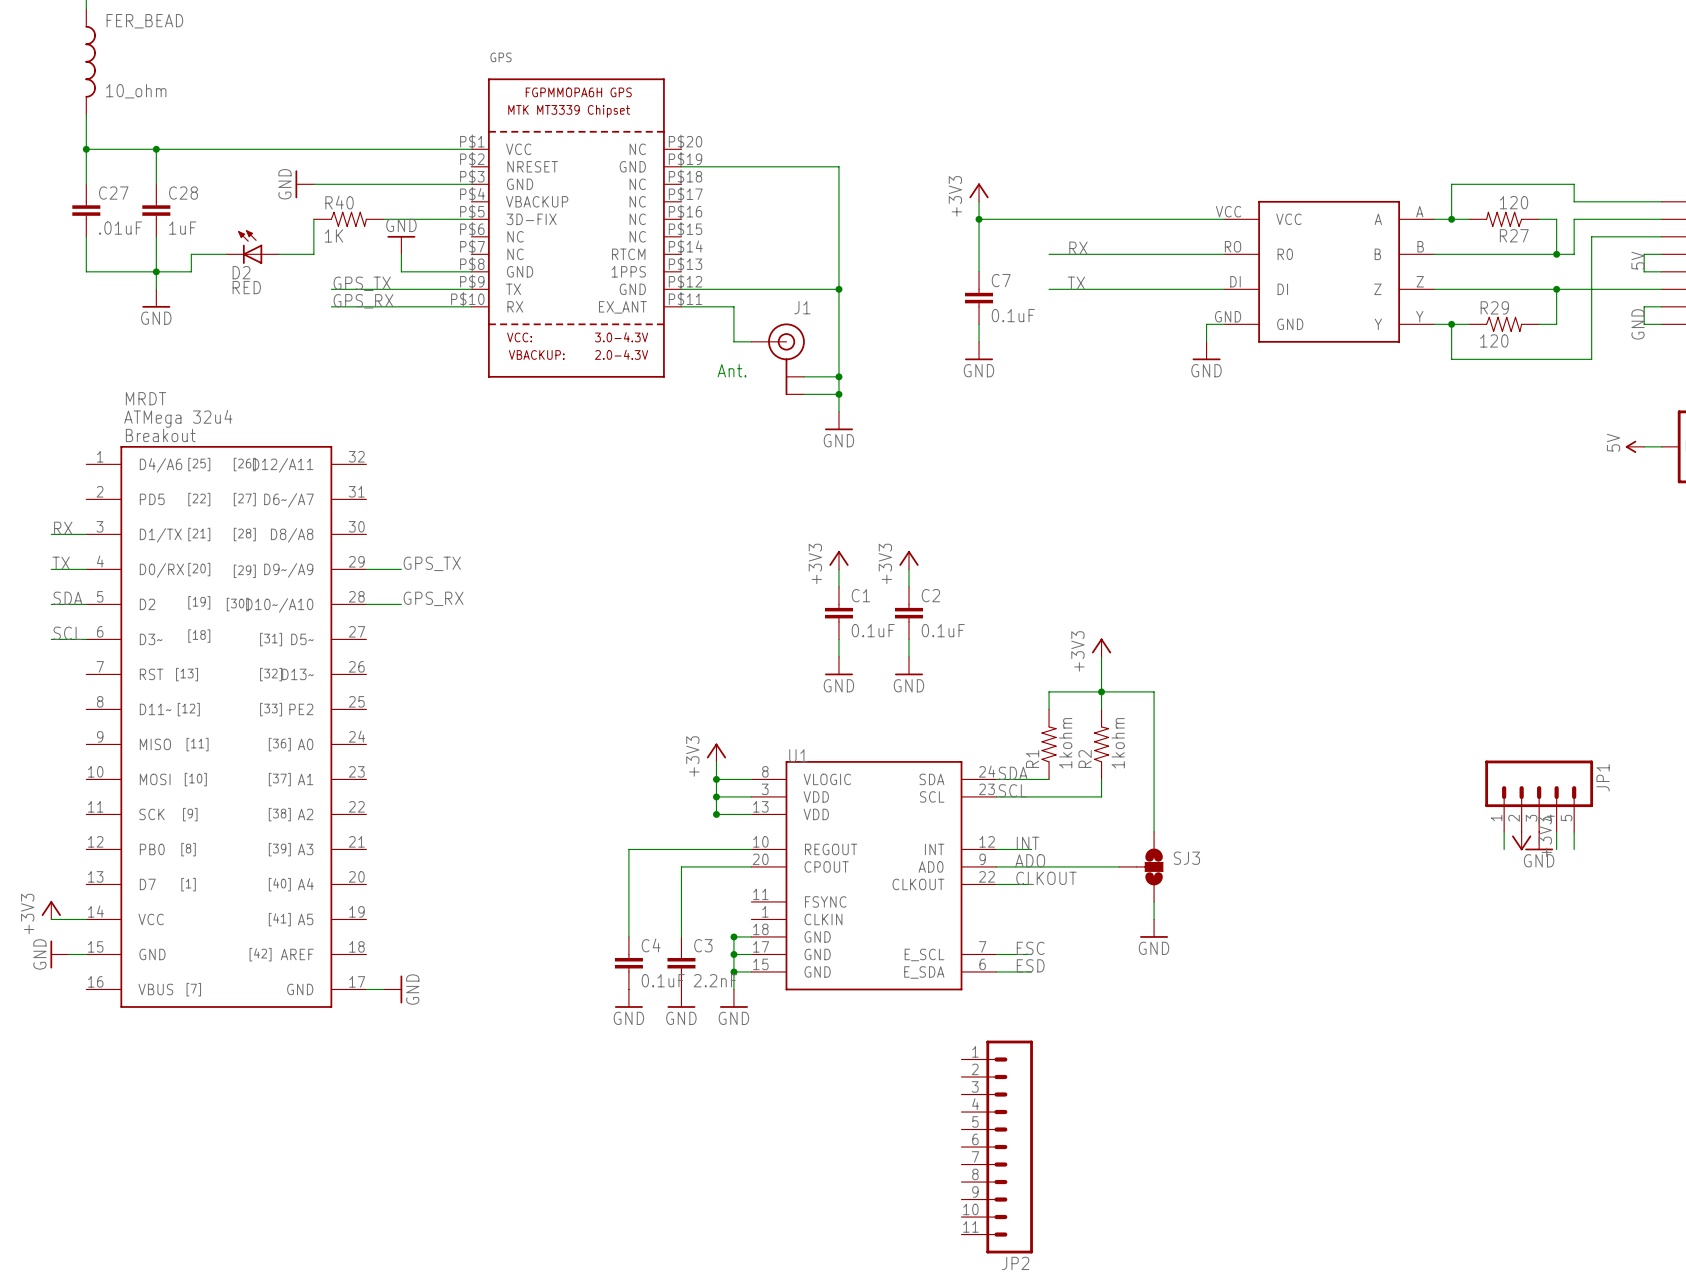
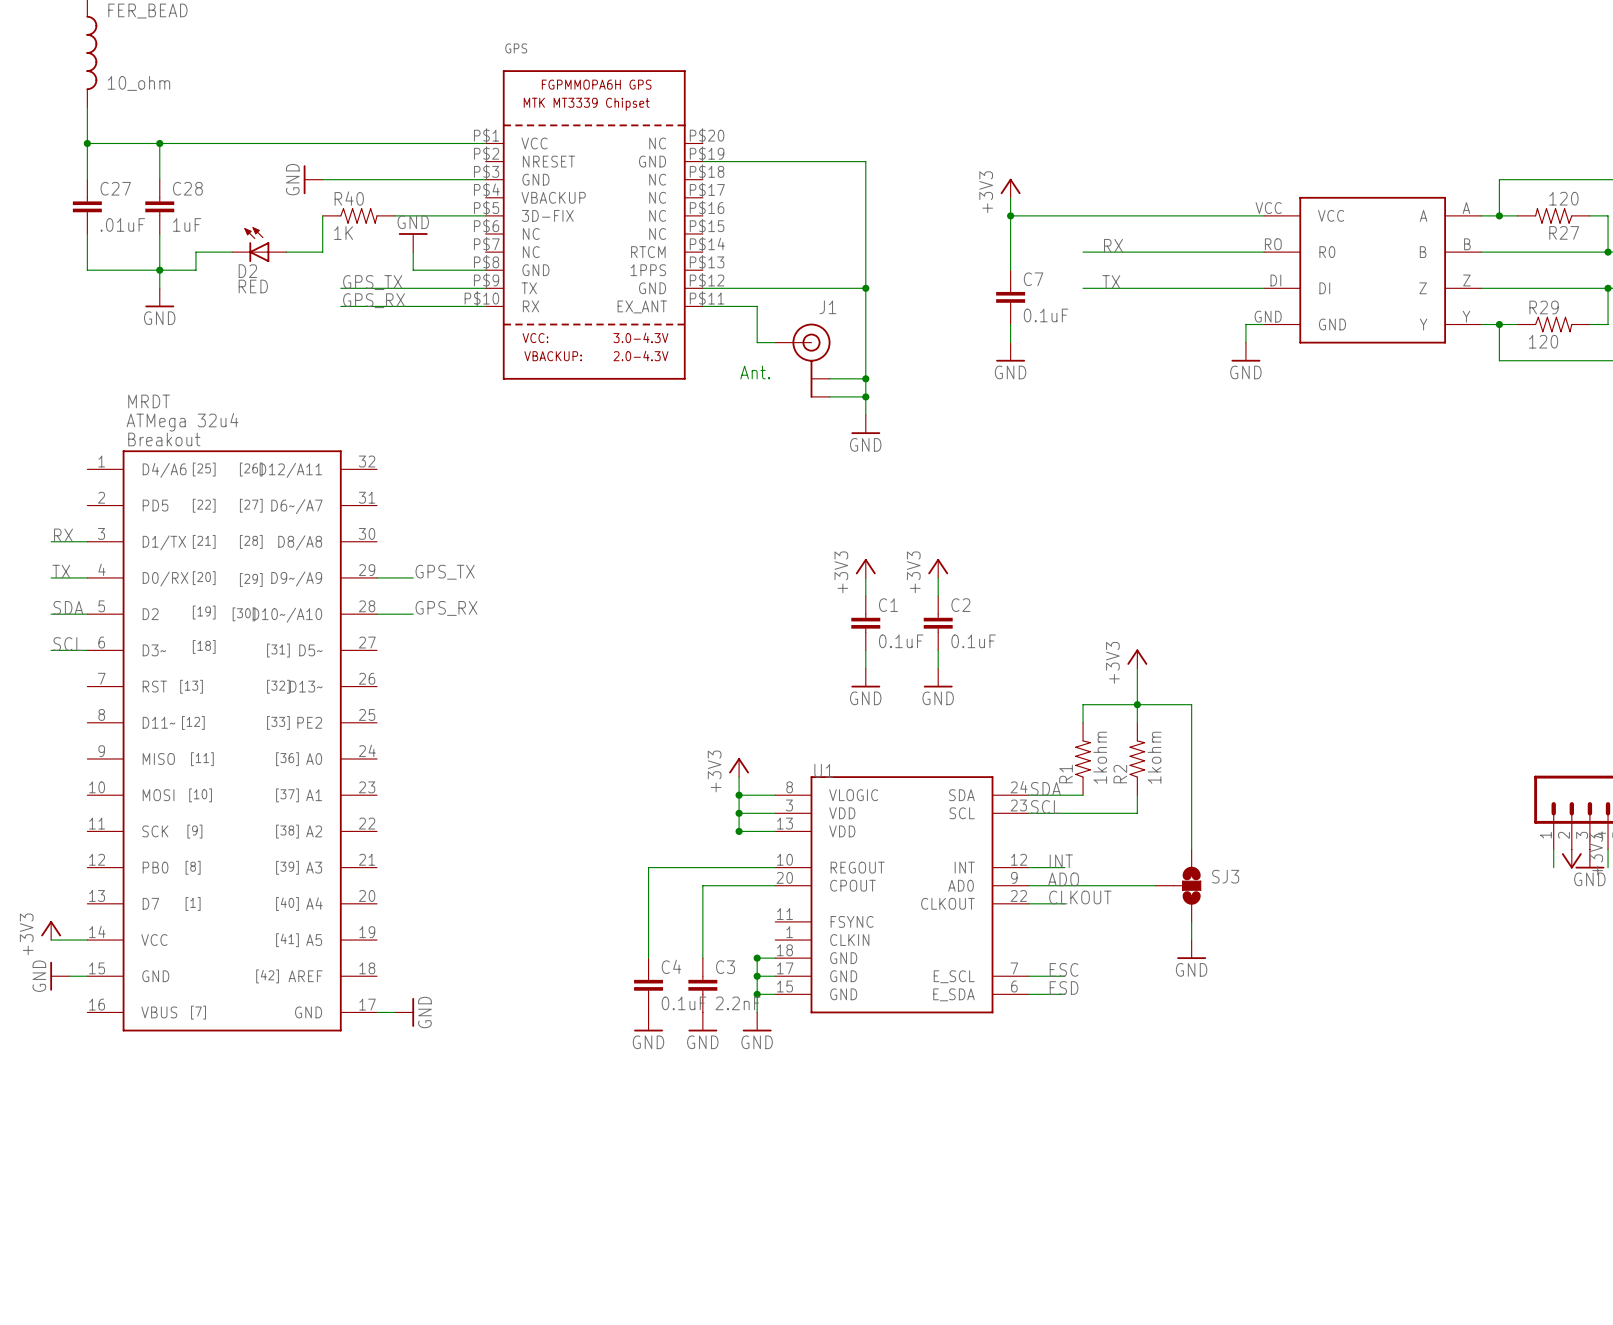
JP2: (997, 1147) -> none

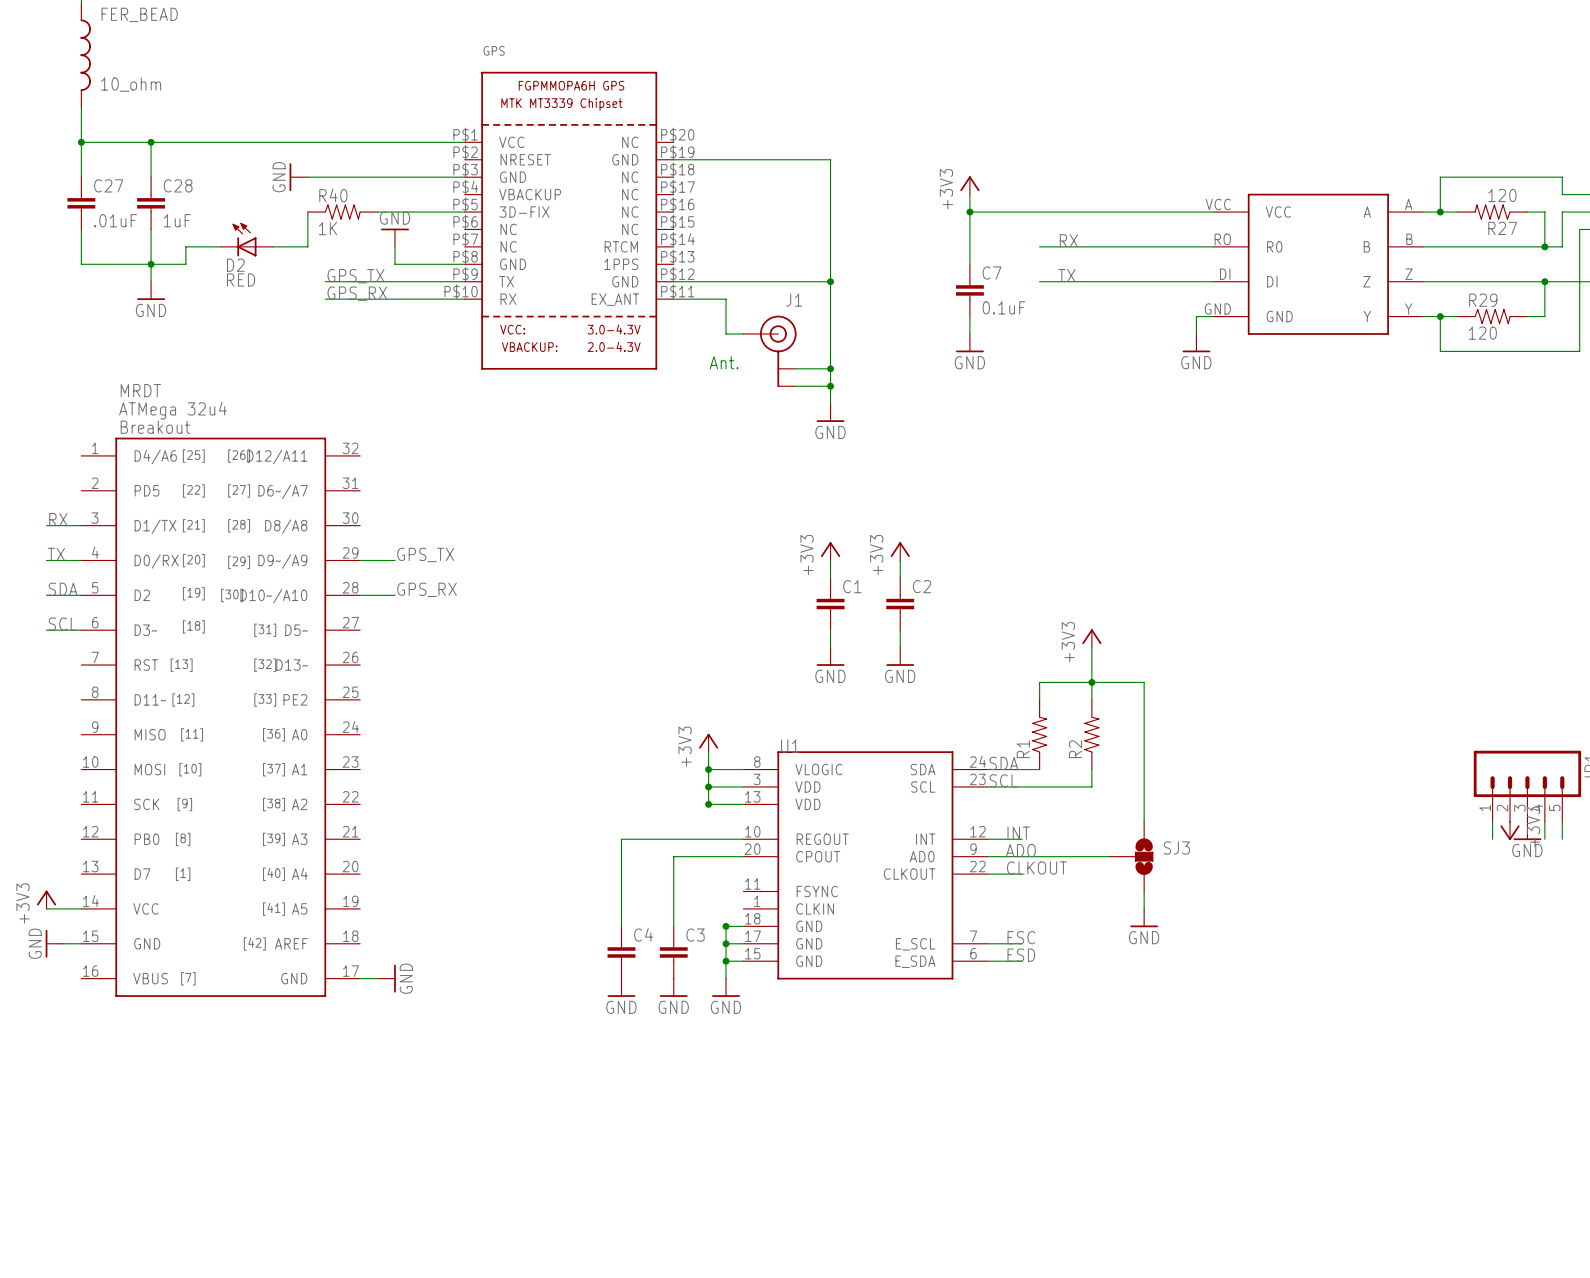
C1 value: 0.1uF (901, 641) -> none
C2 value: 0.1uF (973, 641) -> none
R1 value: 1kohm (1100, 757) -> none
R2 value: 1kohm (1154, 757) -> none
C4 value: 0.1uF (683, 1003) -> none
C3 value: 2.2nF (738, 1003) -> none

